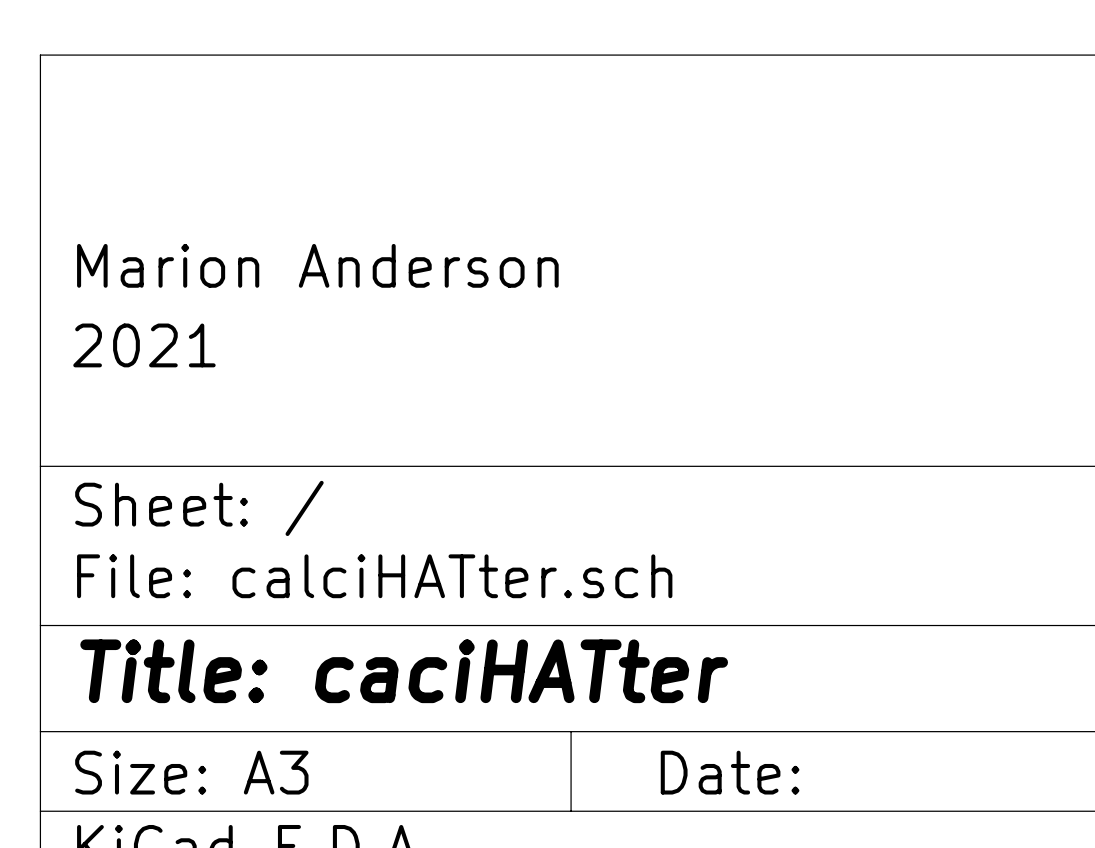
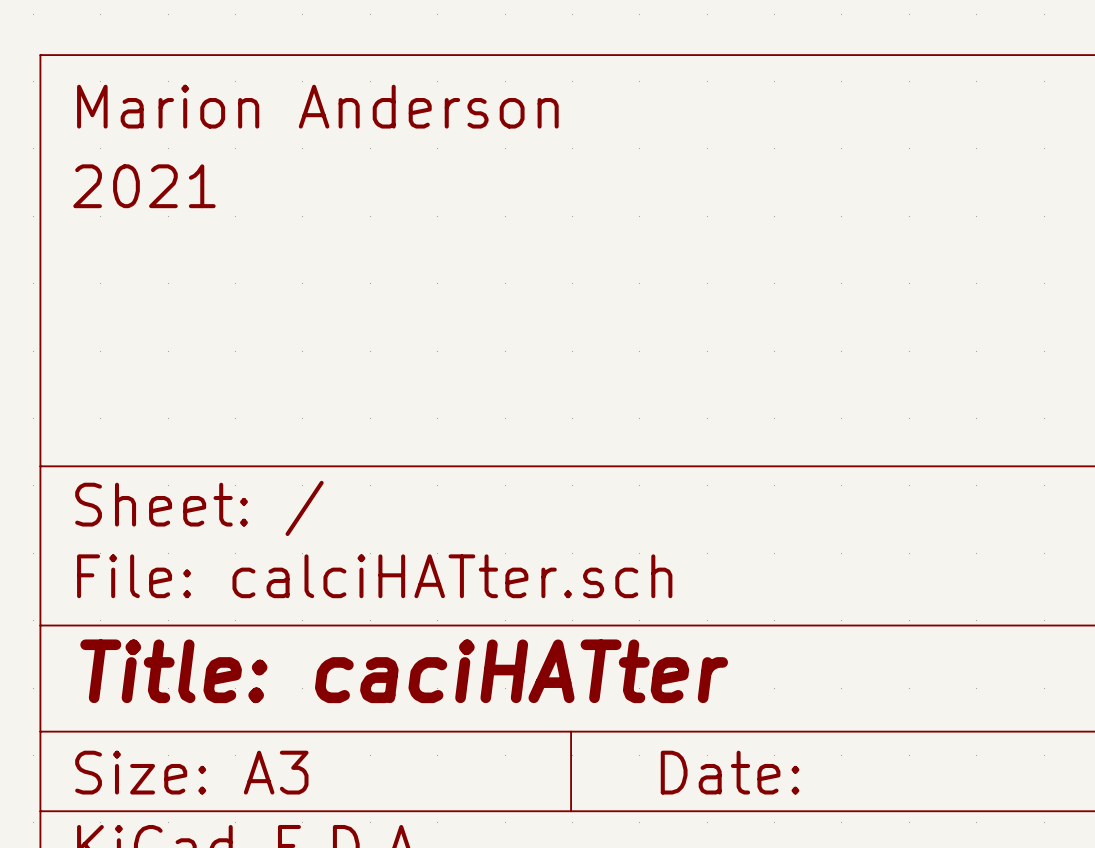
title block position: Marion Anderson (317, 265) -> Marion Anderson (317, 106)
title block position: 2021 (144, 345) -> 2021 (144, 186)

